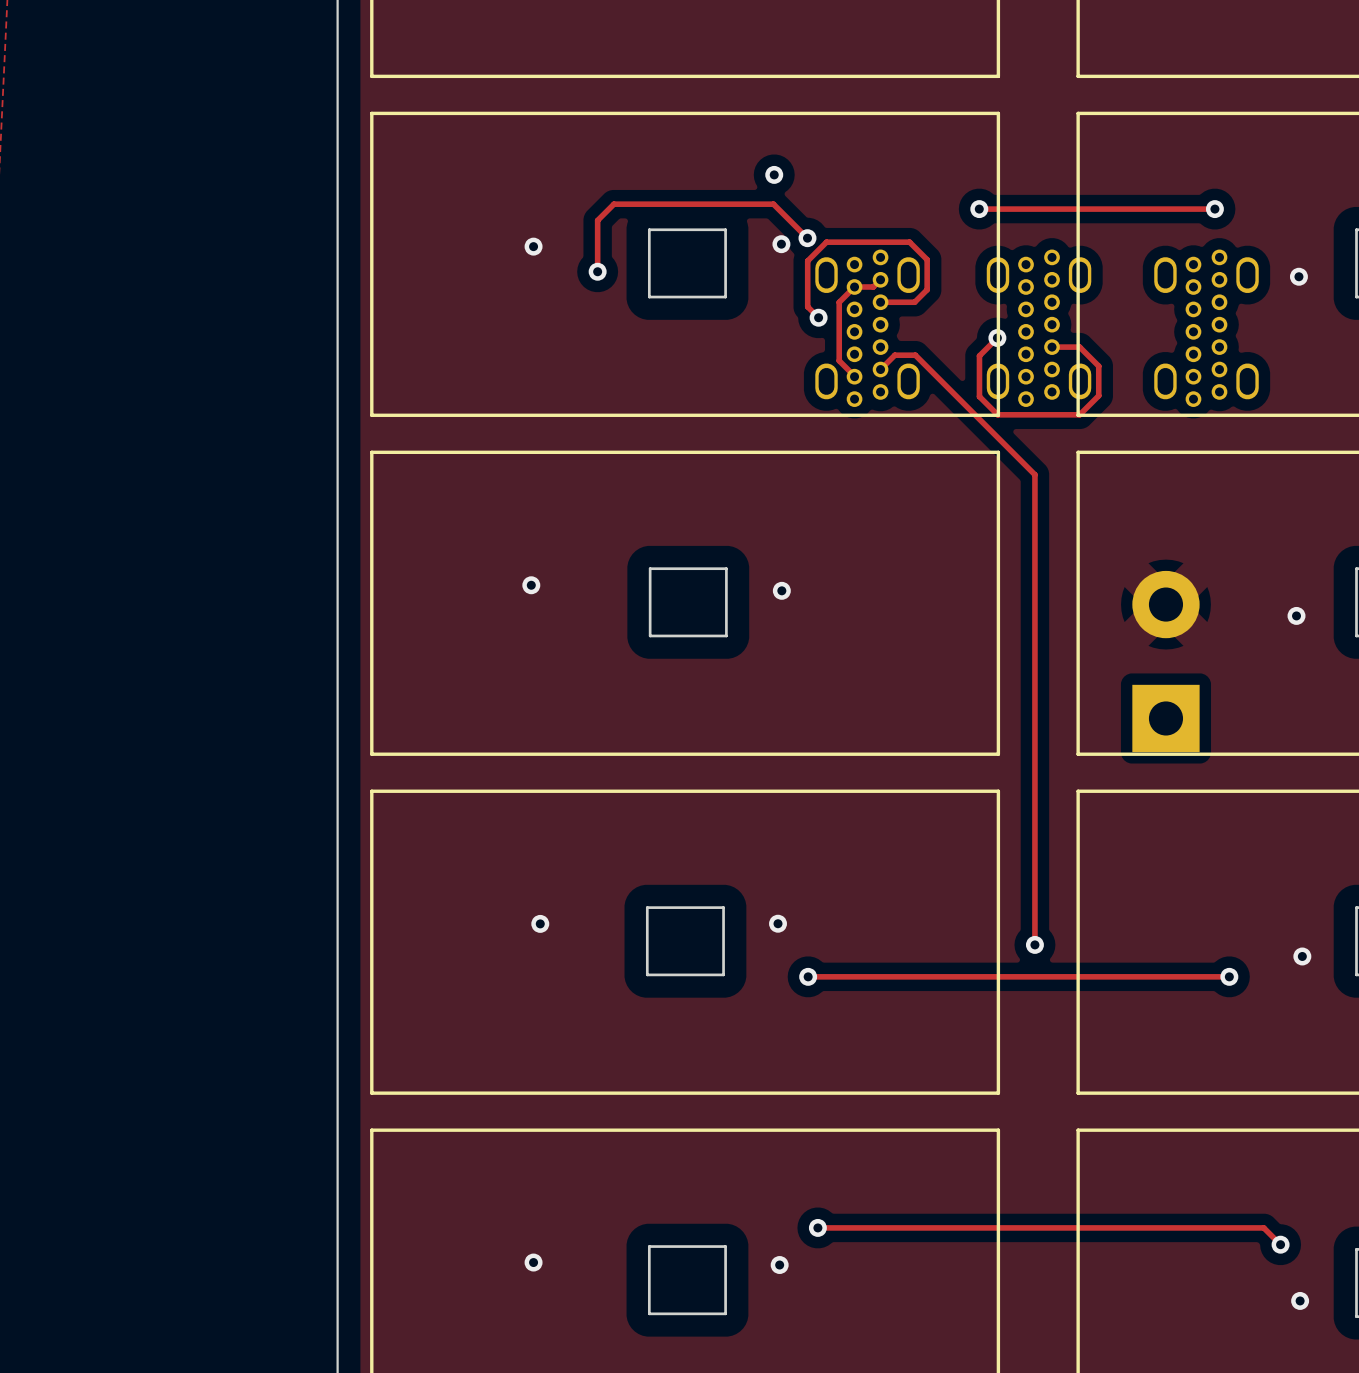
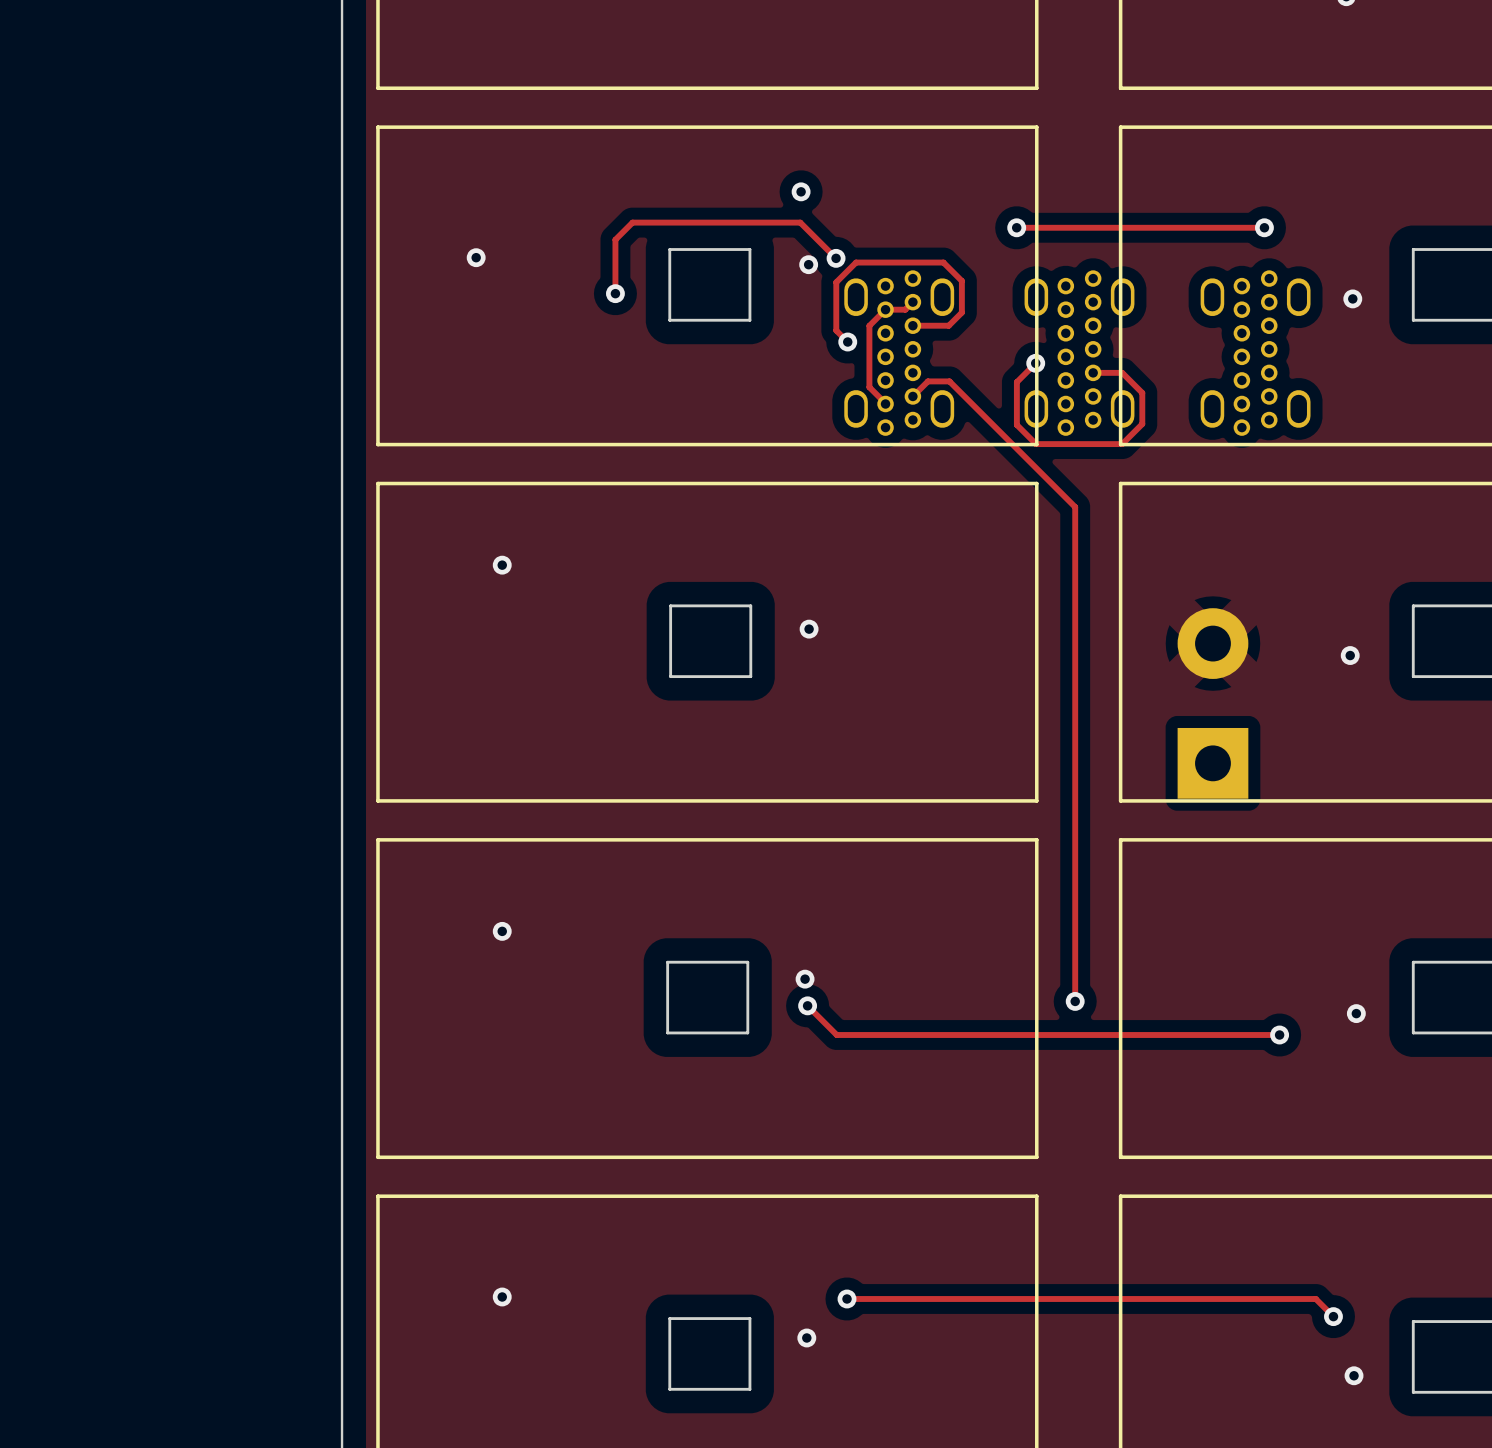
via position: (533, 246) -> (476, 257)
via position: (531, 585) -> (502, 565)
via position: (540, 923) -> (502, 931)
track: none -> (807, 1005) (836, 1035)
via position: (808, 976) -> (807, 1005)
via position: (533, 1262) -> (502, 1296)

